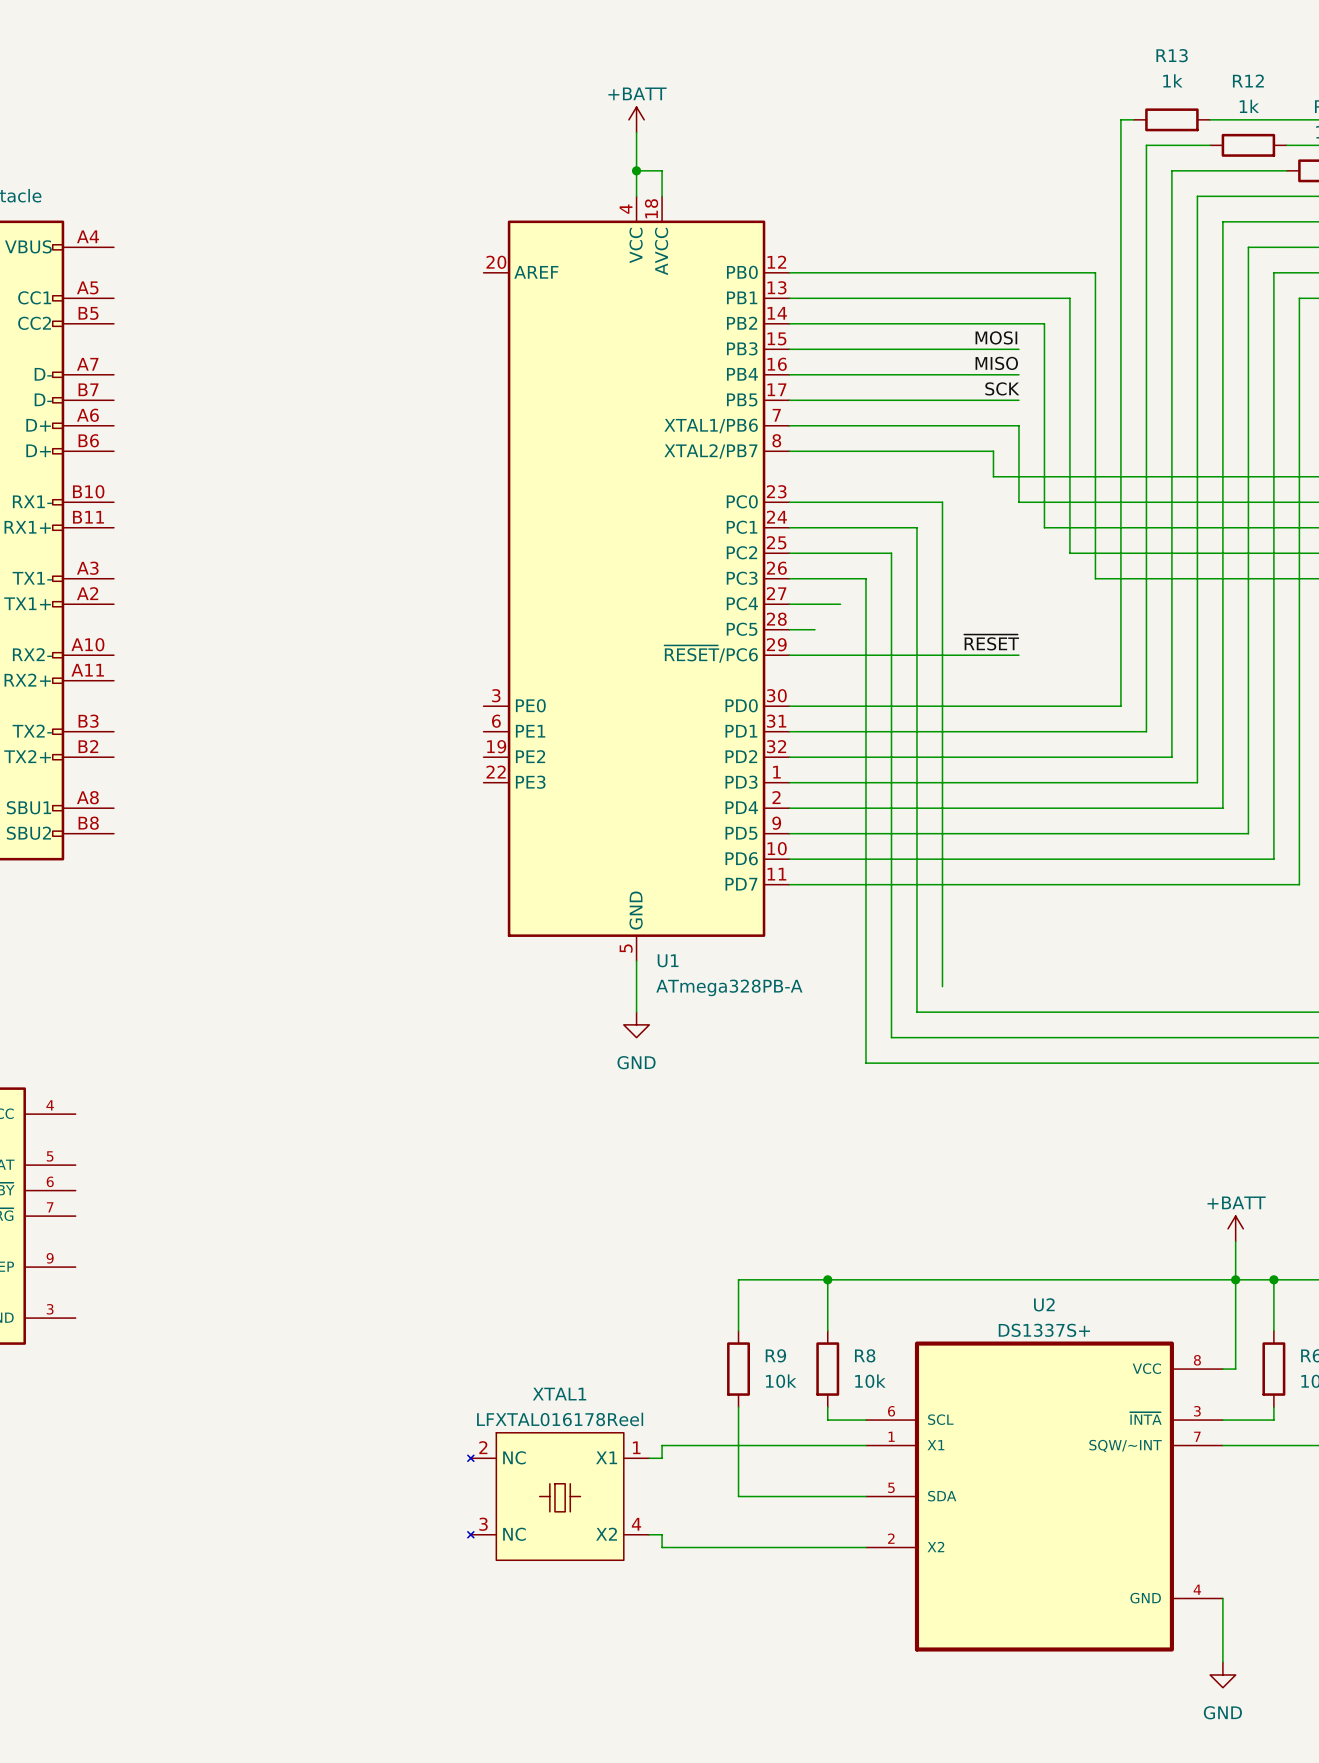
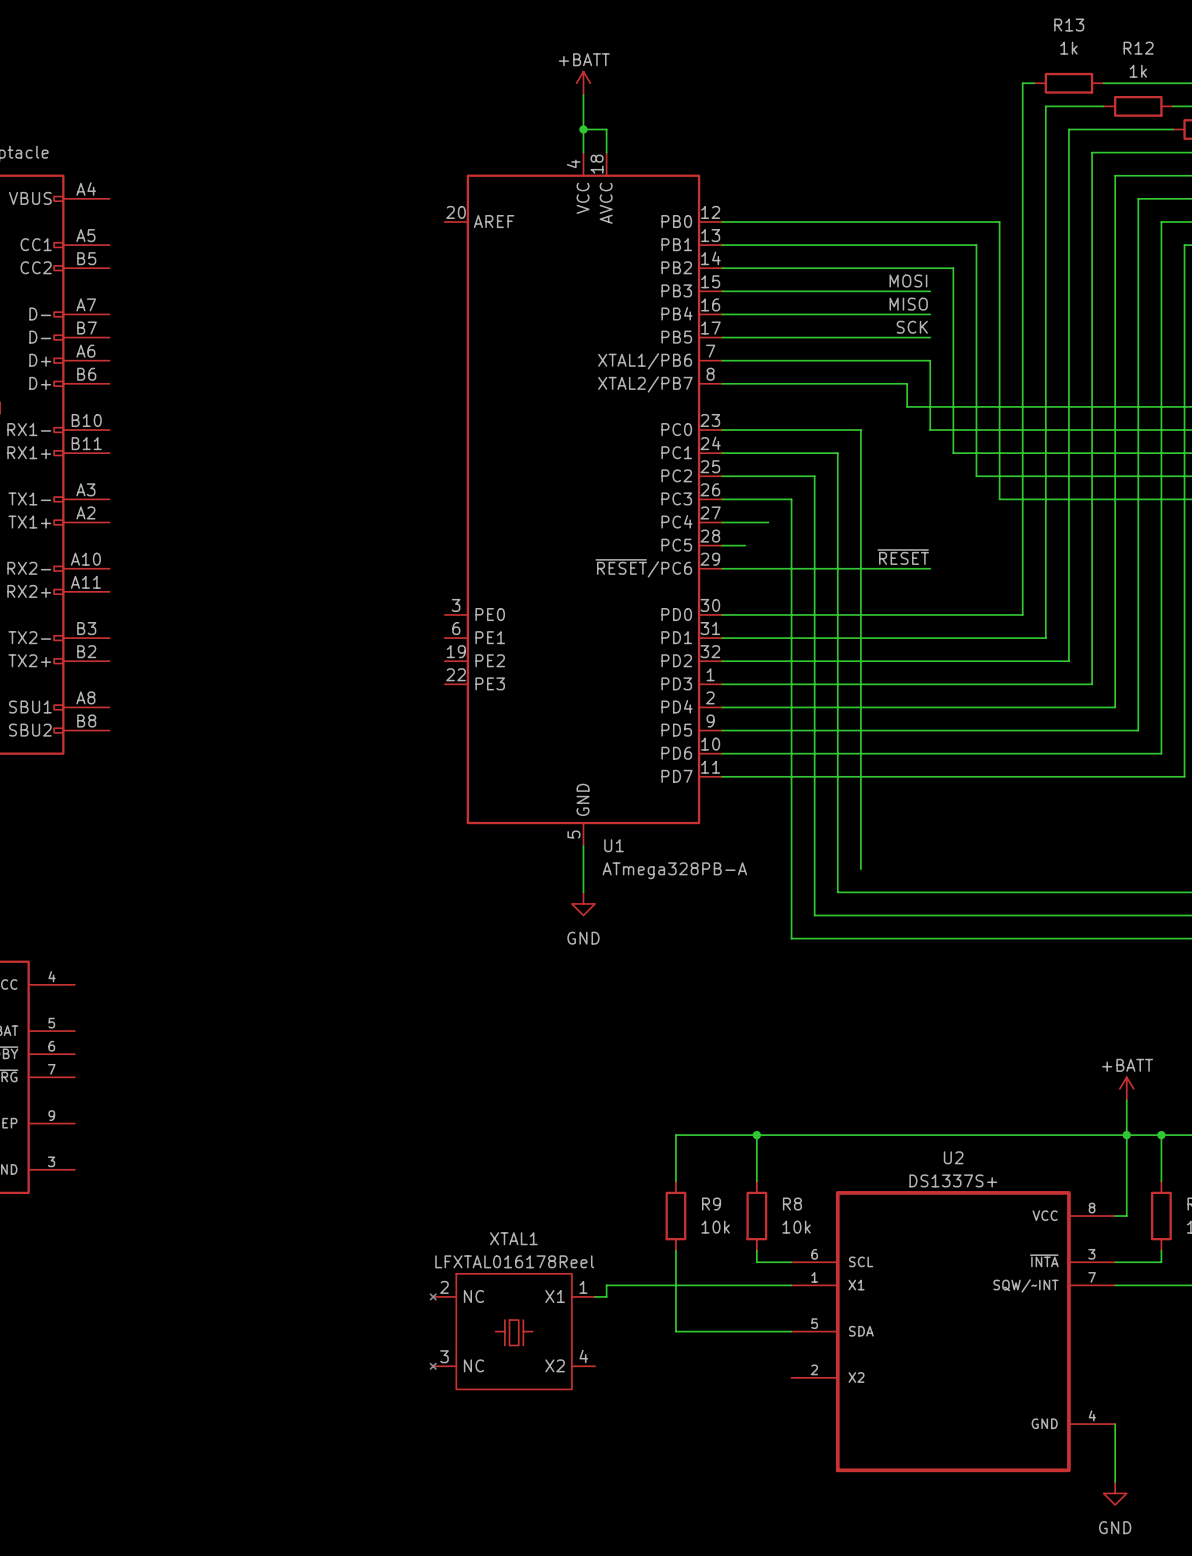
wire: (649, 1534) (662, 1534) (662, 1547) (865, 1547) -> none

